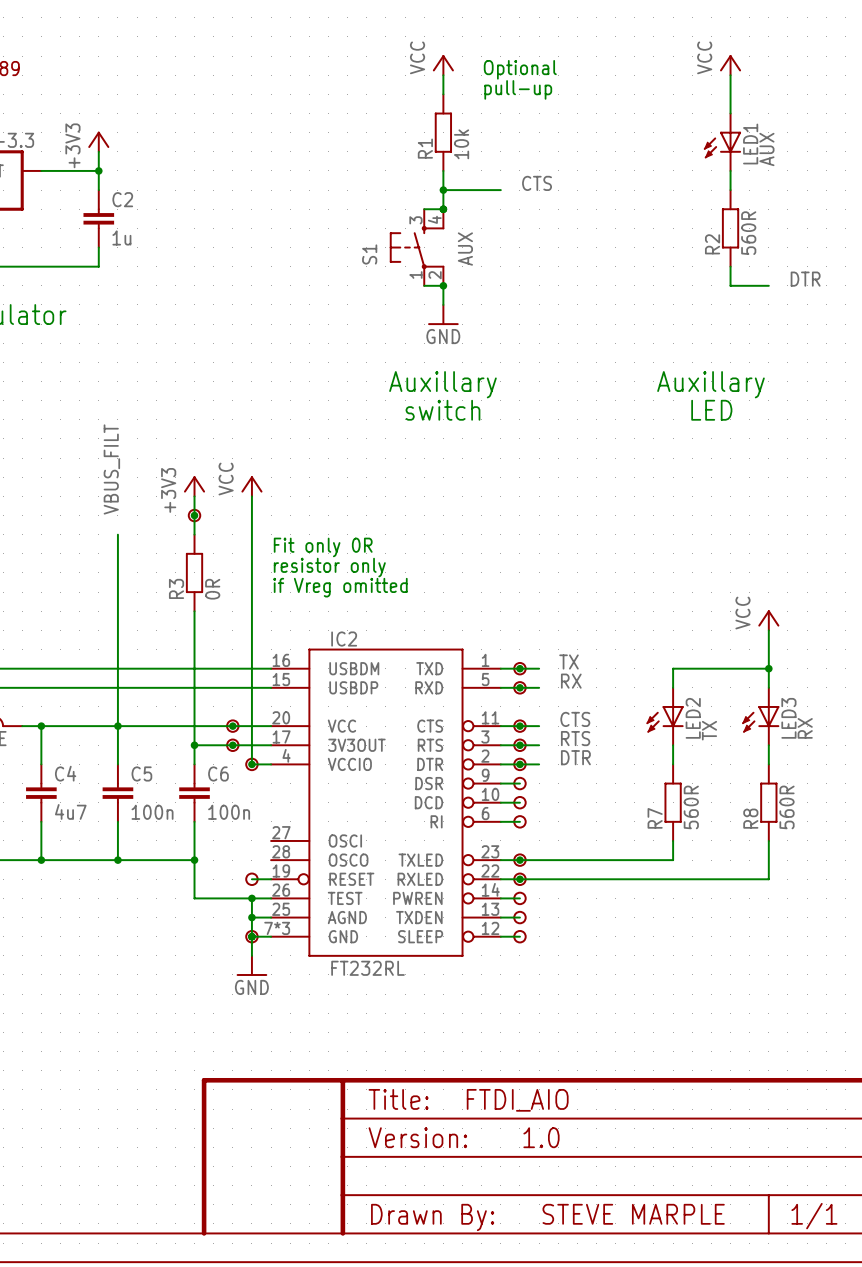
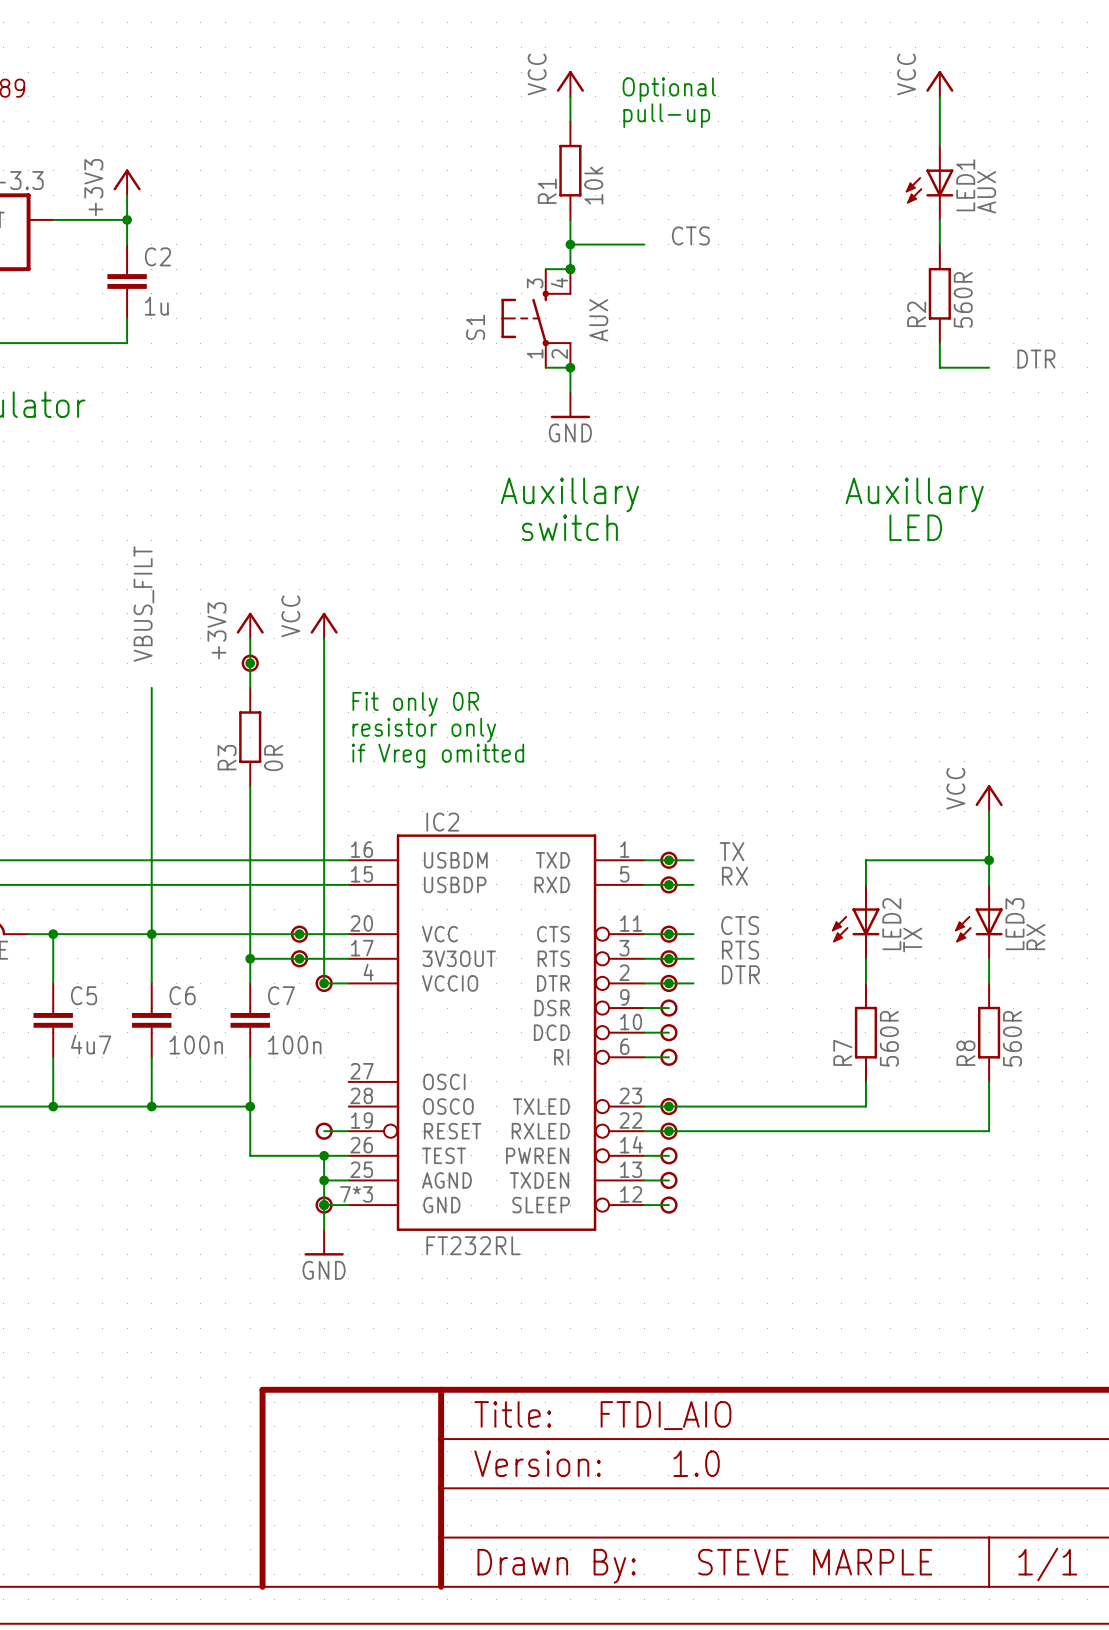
C4 name: C4 (65, 773) -> C5 (84, 995)
C5 name: C5 (141, 773) -> C6 (182, 995)
C6 name: C6 (218, 773) -> C7 (281, 995)

